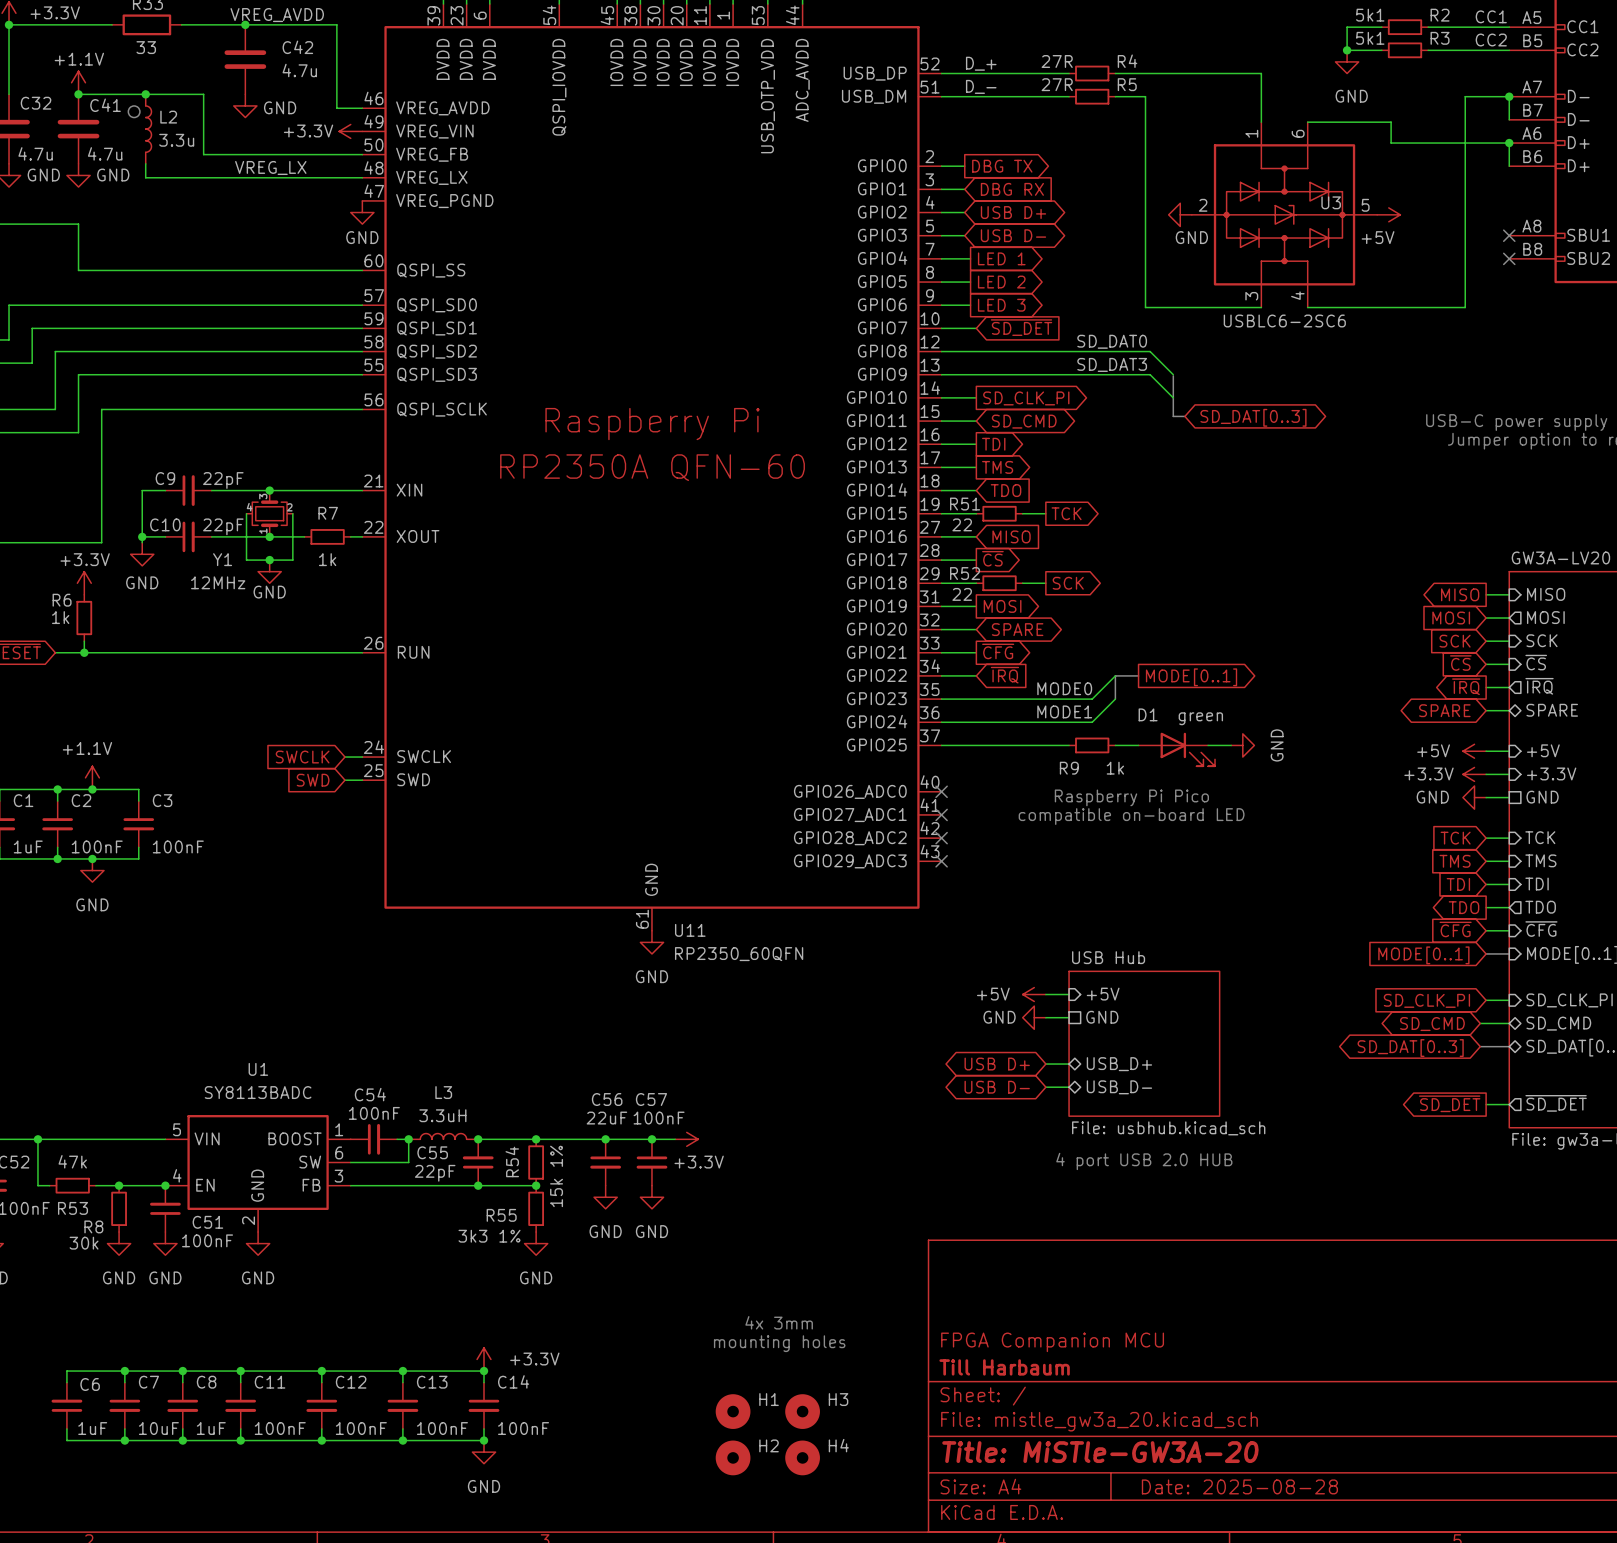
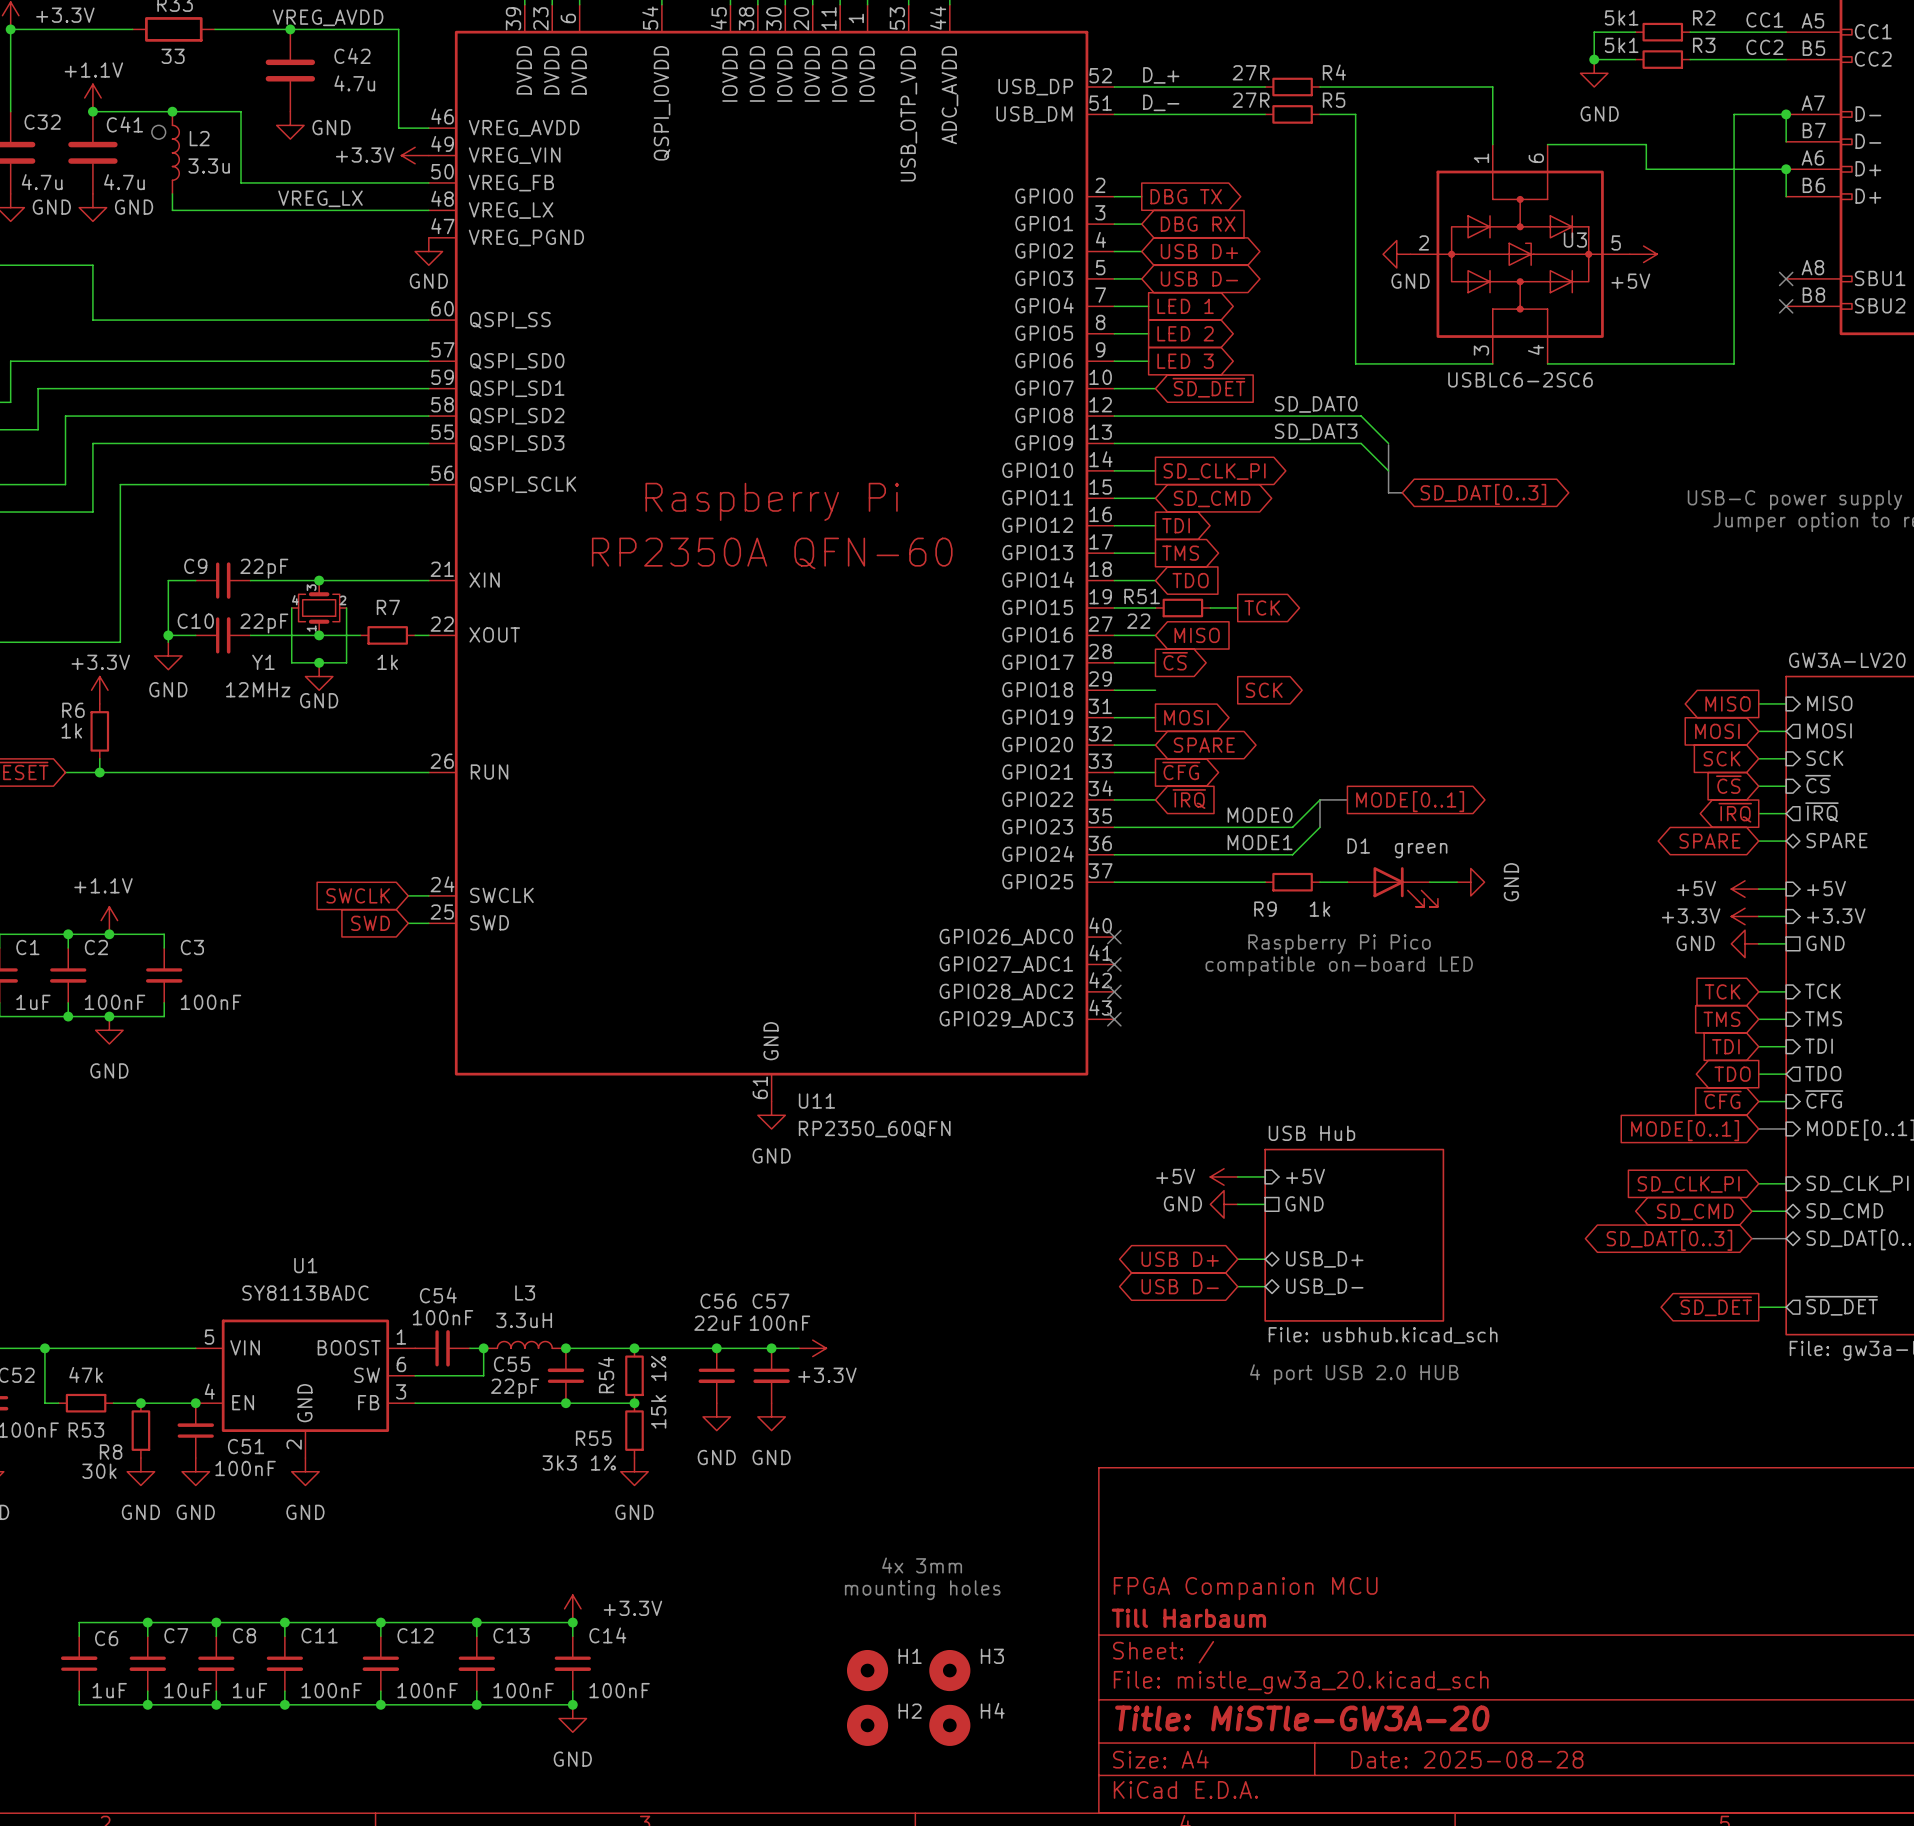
R52: 22 (999, 583) -> none
wire: (1022, 583) (1045, 583) -> none

